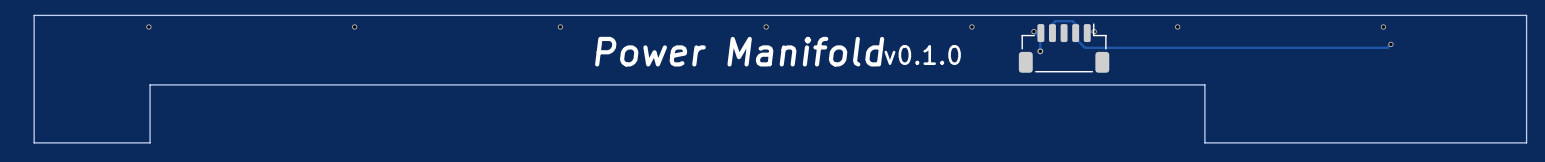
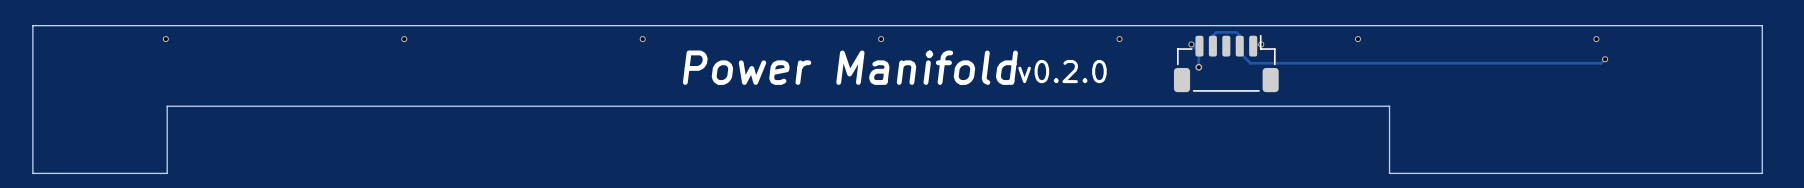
text: v0.1.0 (922, 54) -> v0.2.0 (1062, 71)

